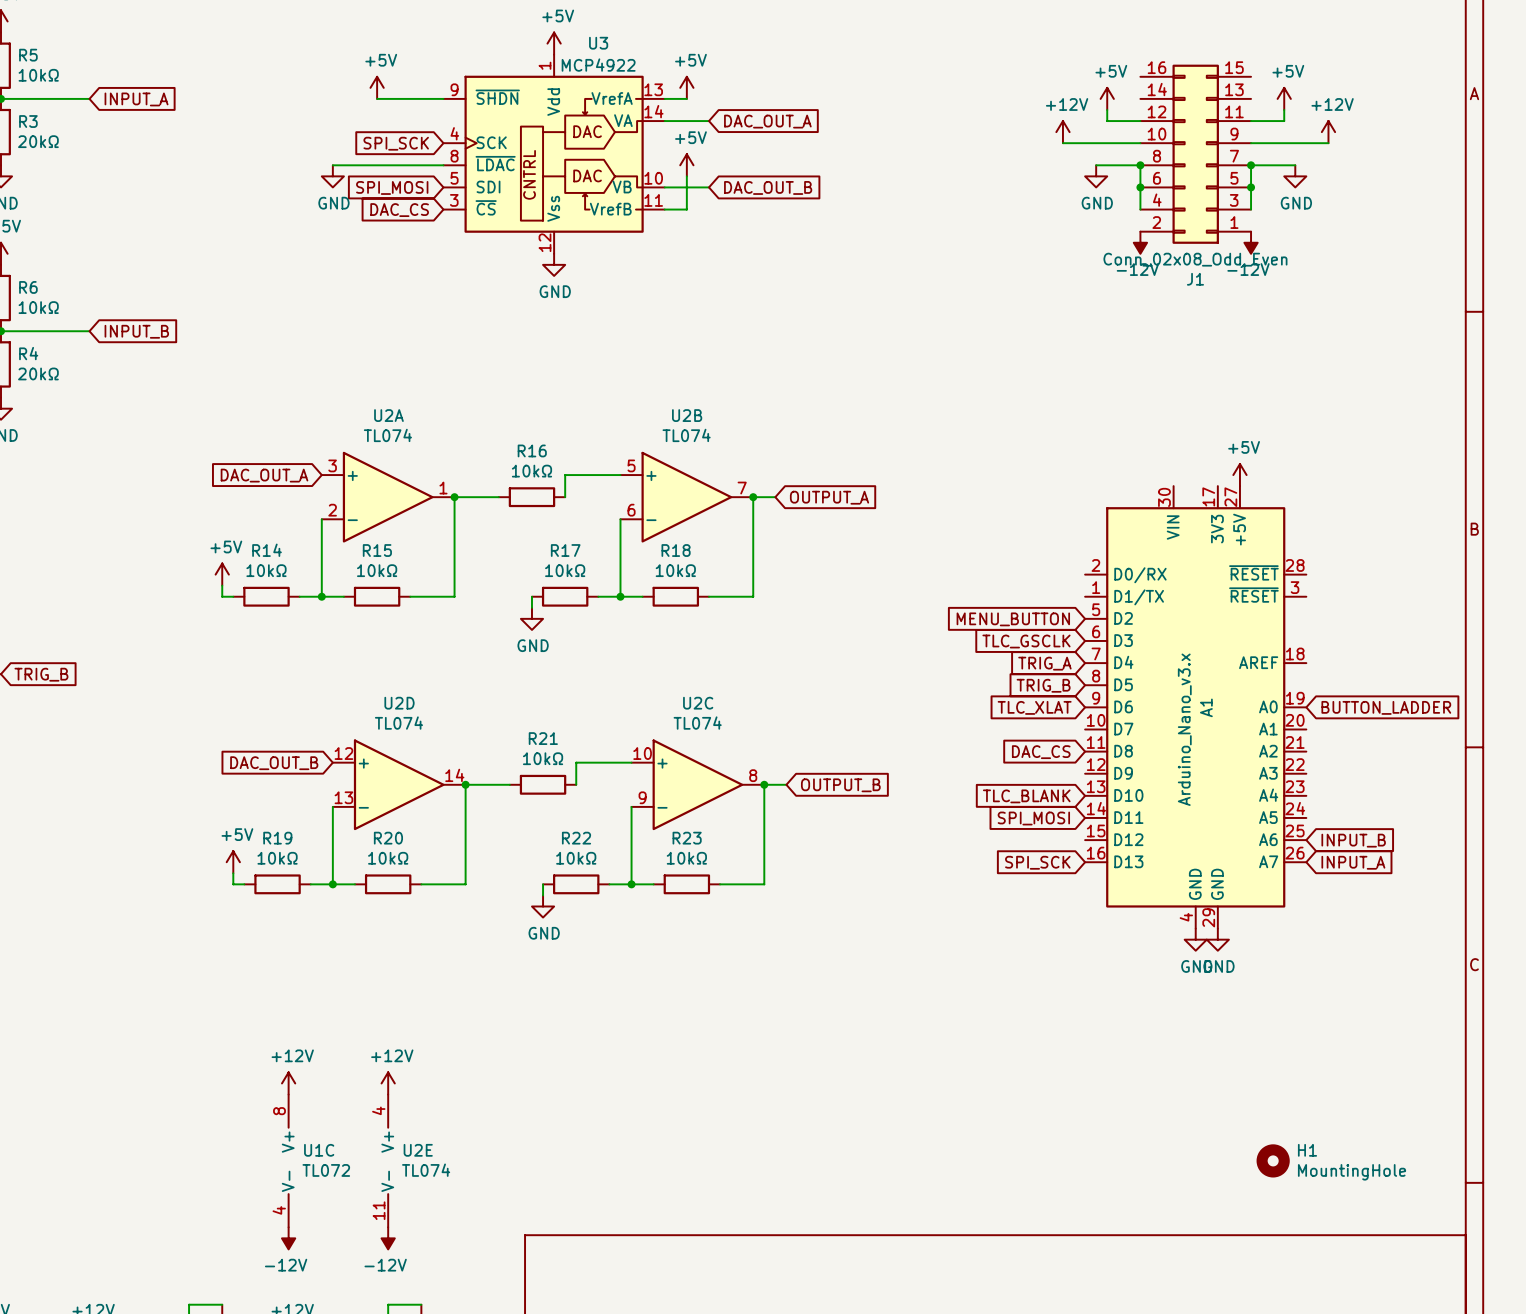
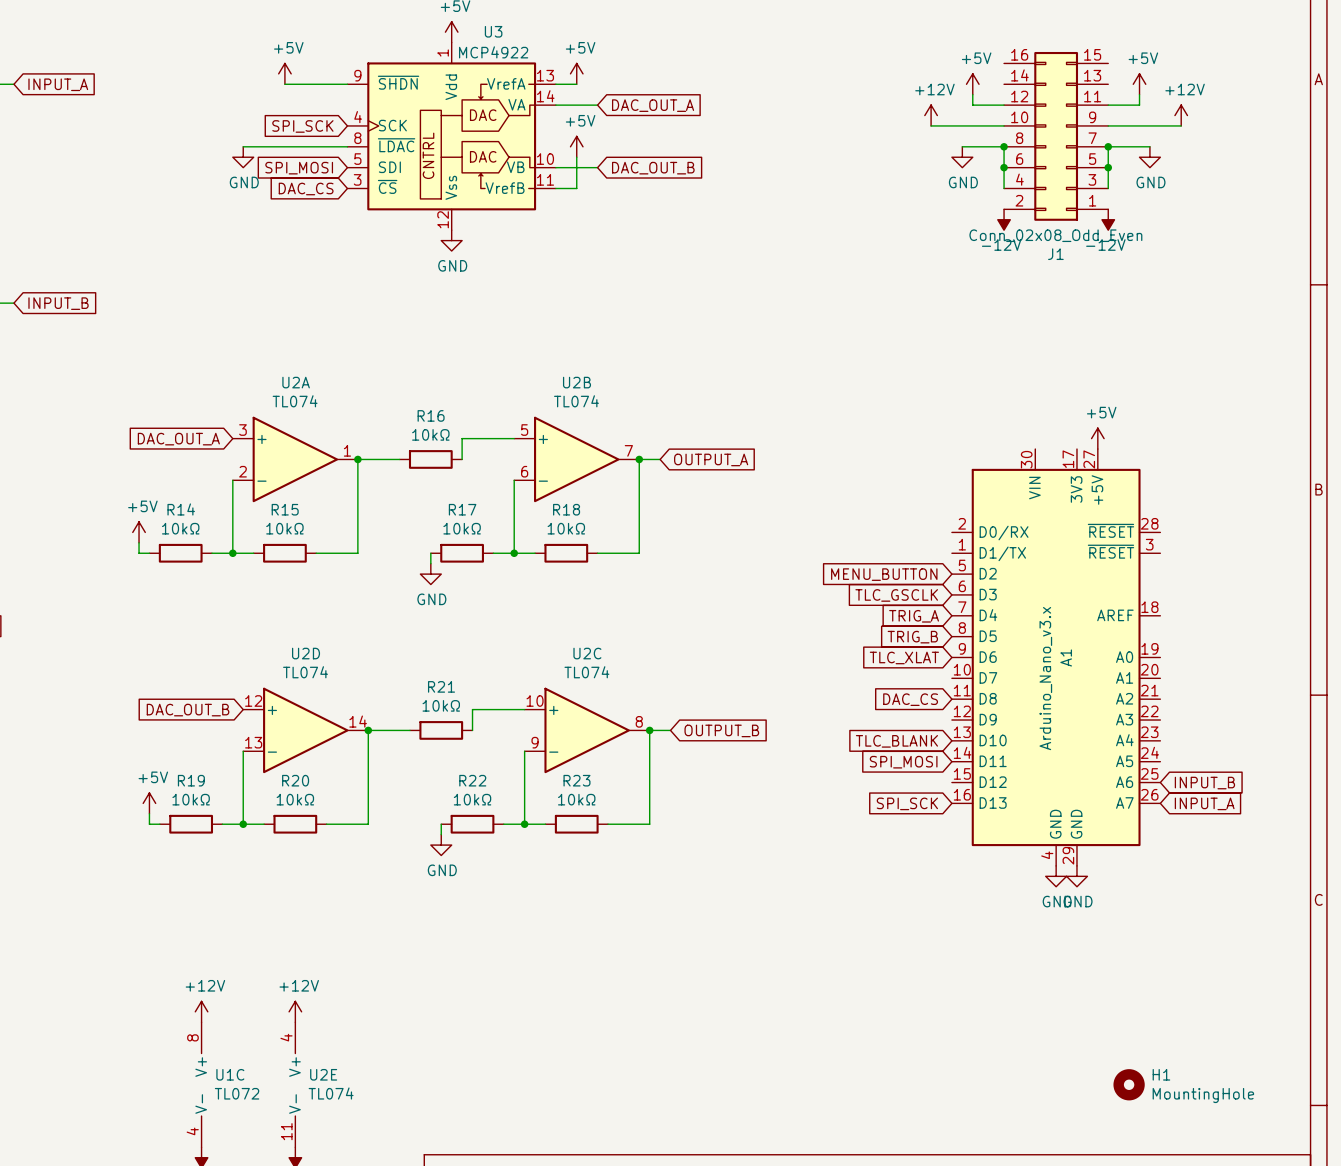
global label: BUTTON_LADDER (1386, 707) -> none

